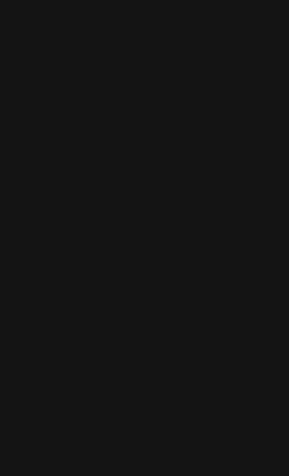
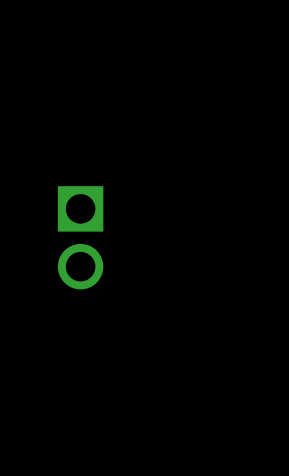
part: none -> (80, 237)

